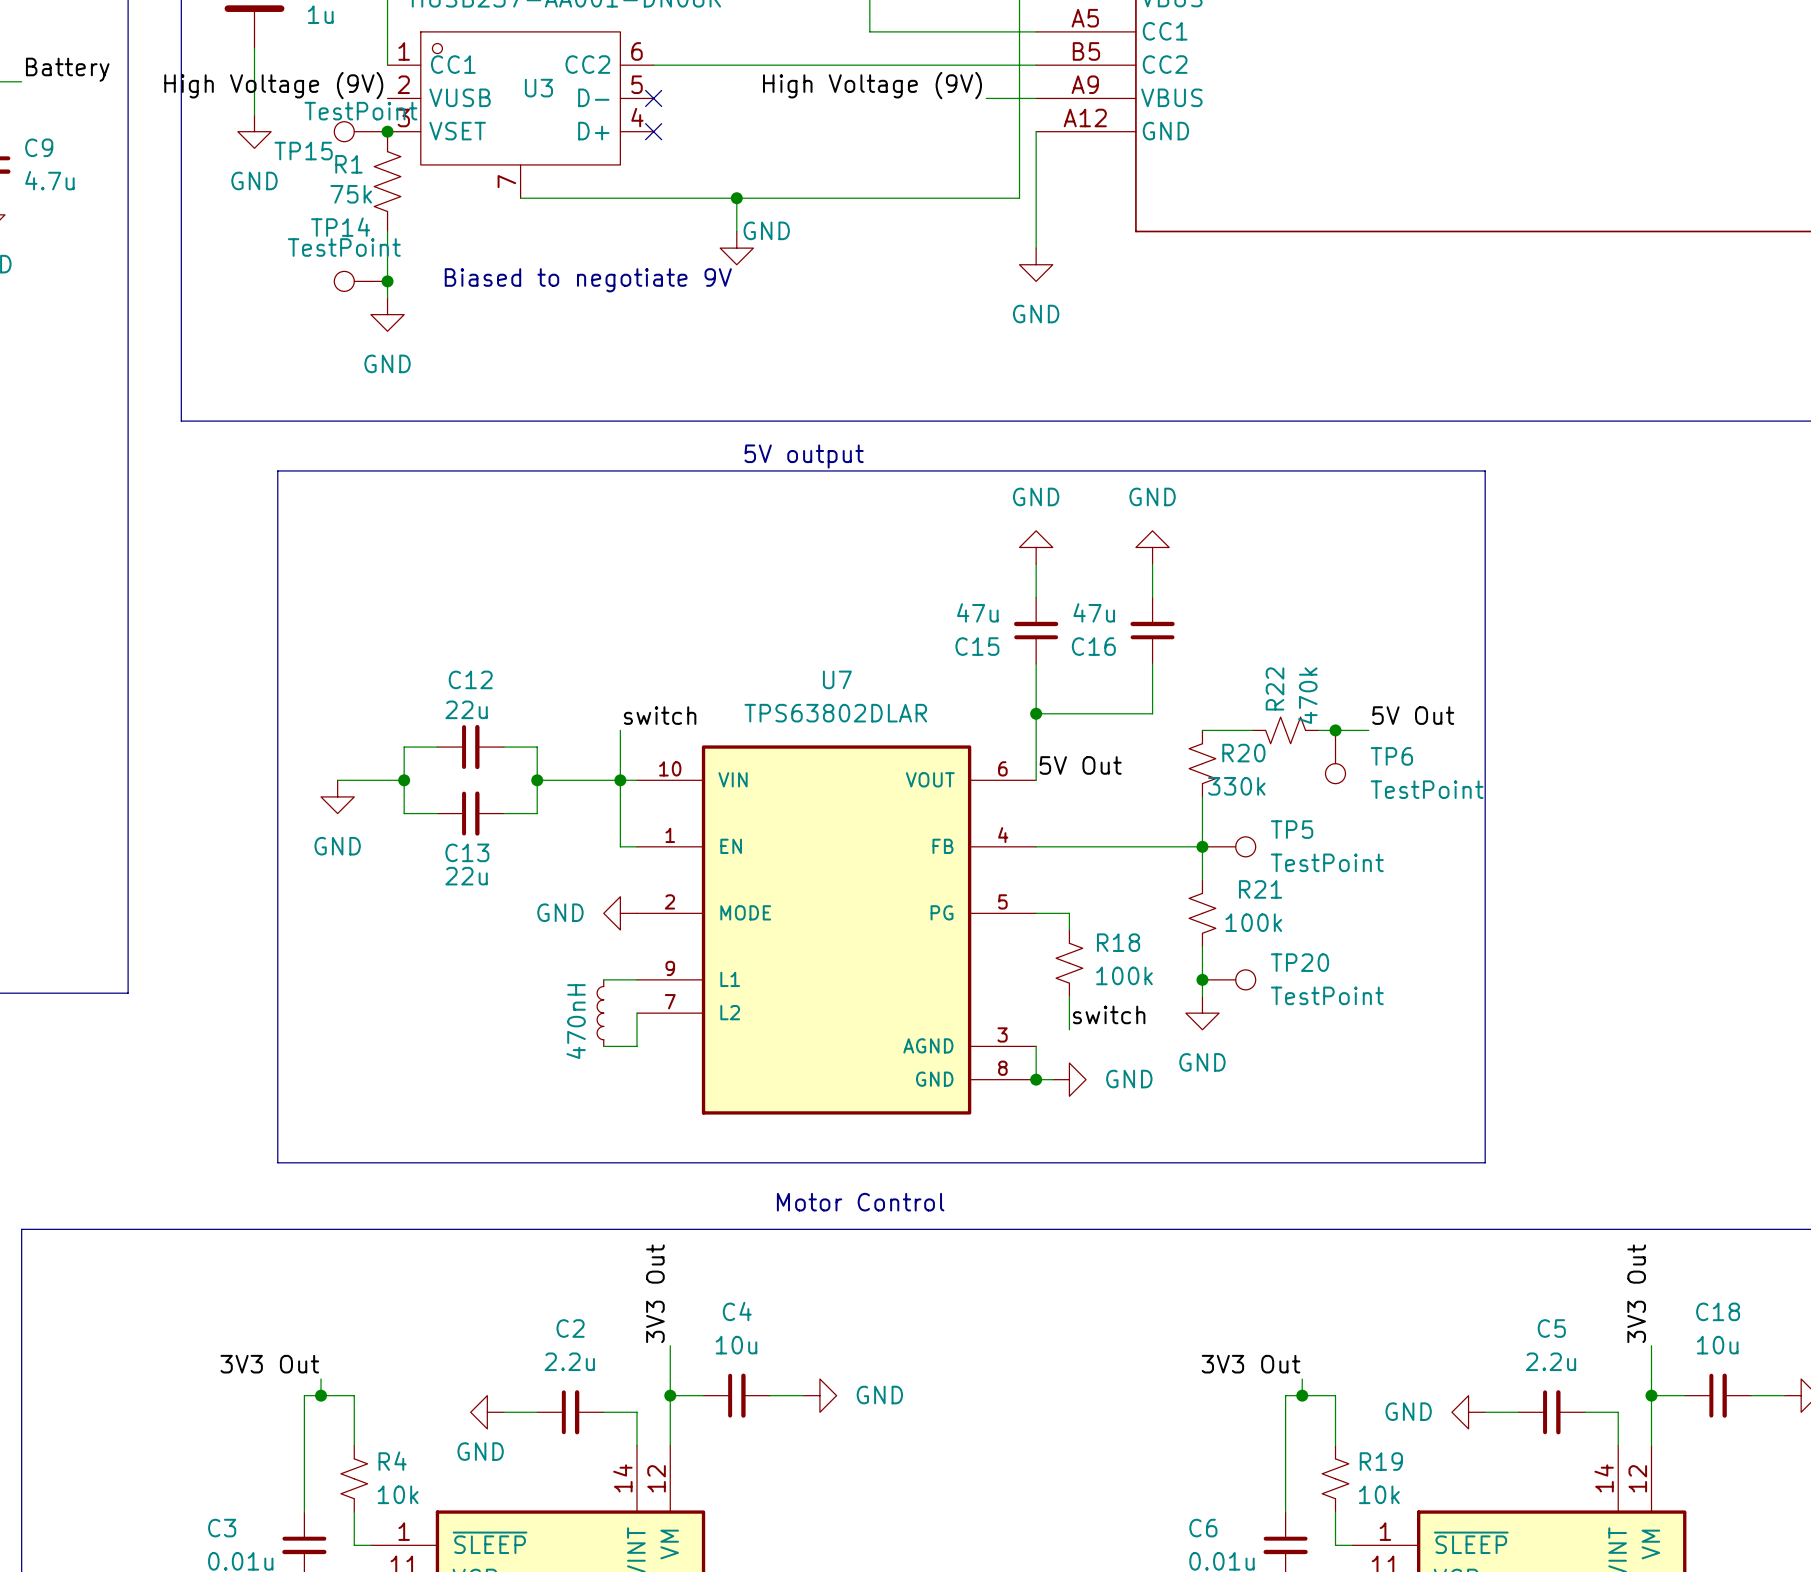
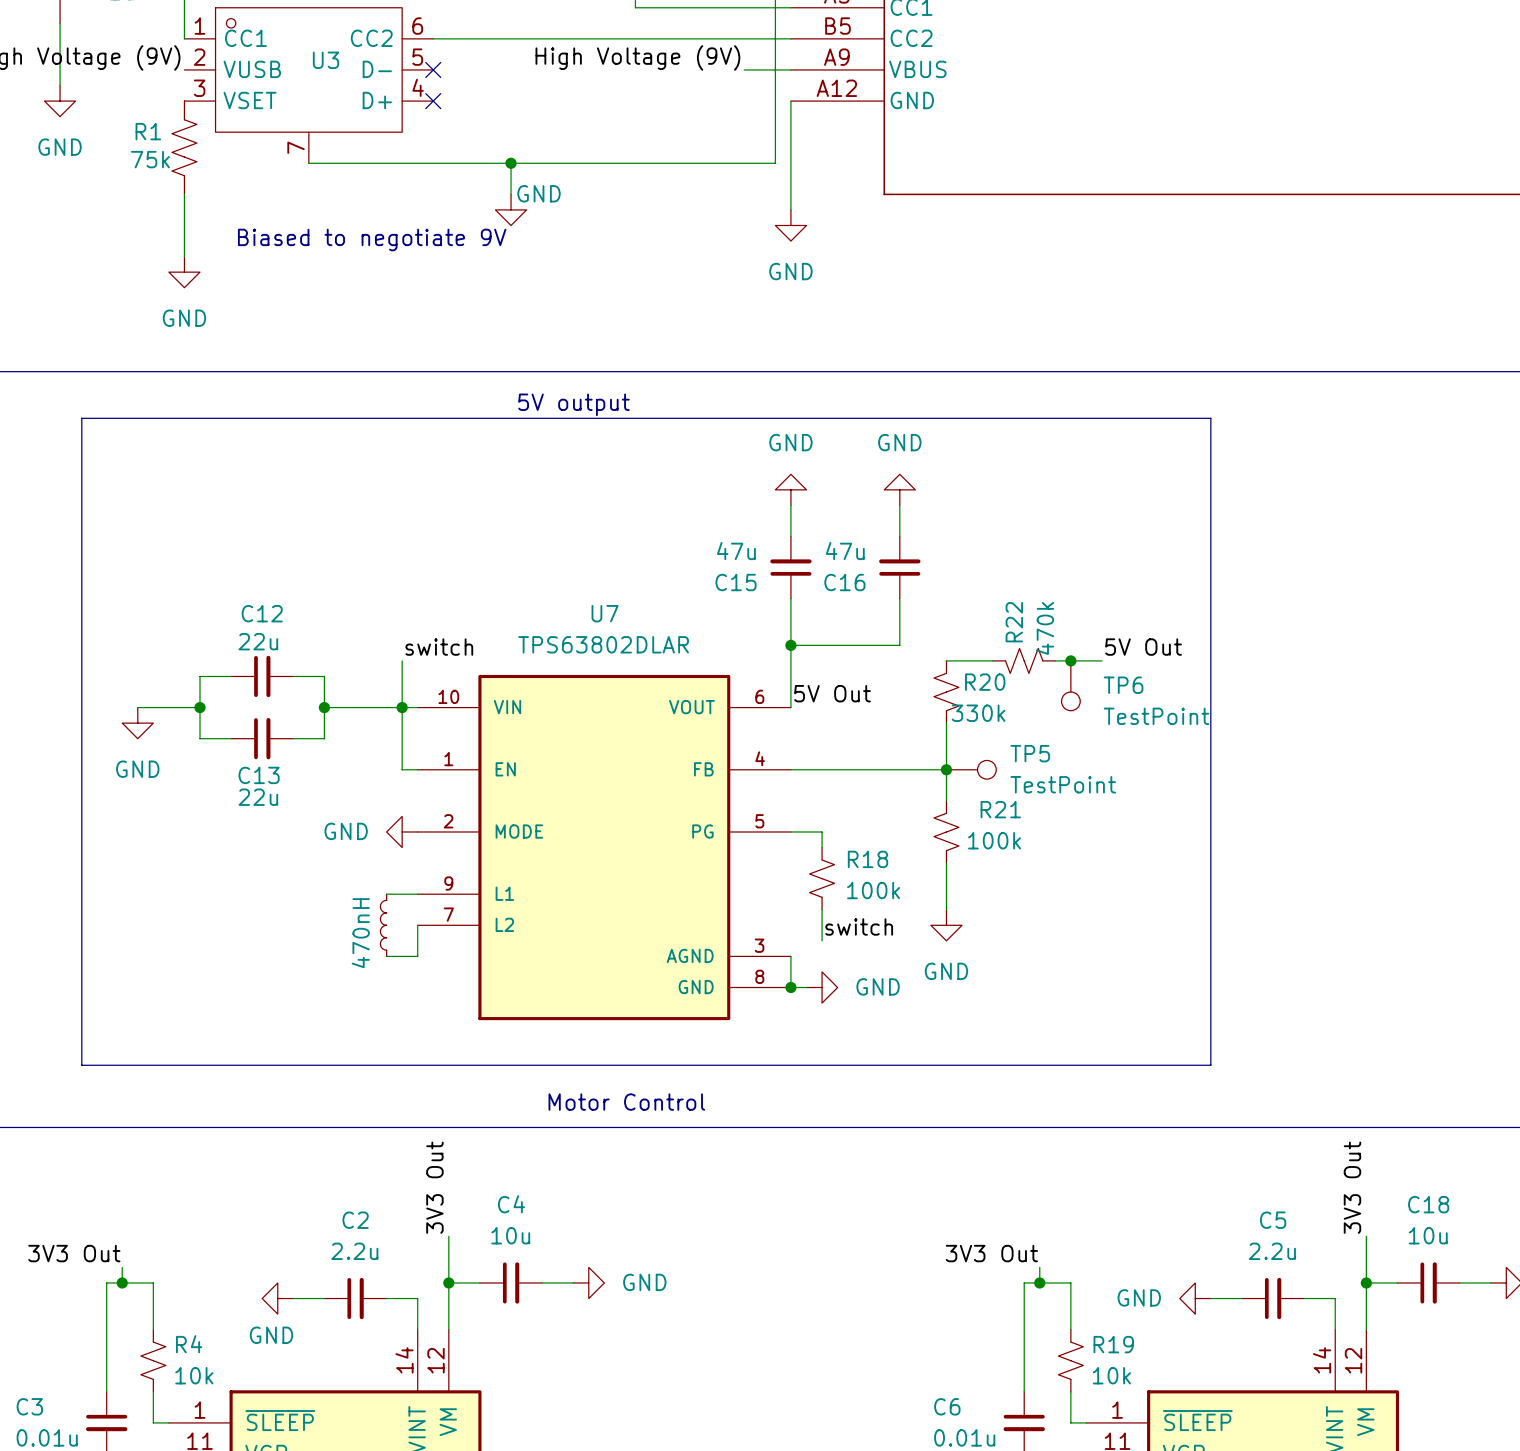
TP15: TestPoint (360, 131) -> none
junction: (387, 131) -> none
TP14: TestPoint (360, 281) -> none
junction: (387, 281) -> none
junction: (1202, 979) -> none
TP20: TestPoint (1229, 979) -> none

